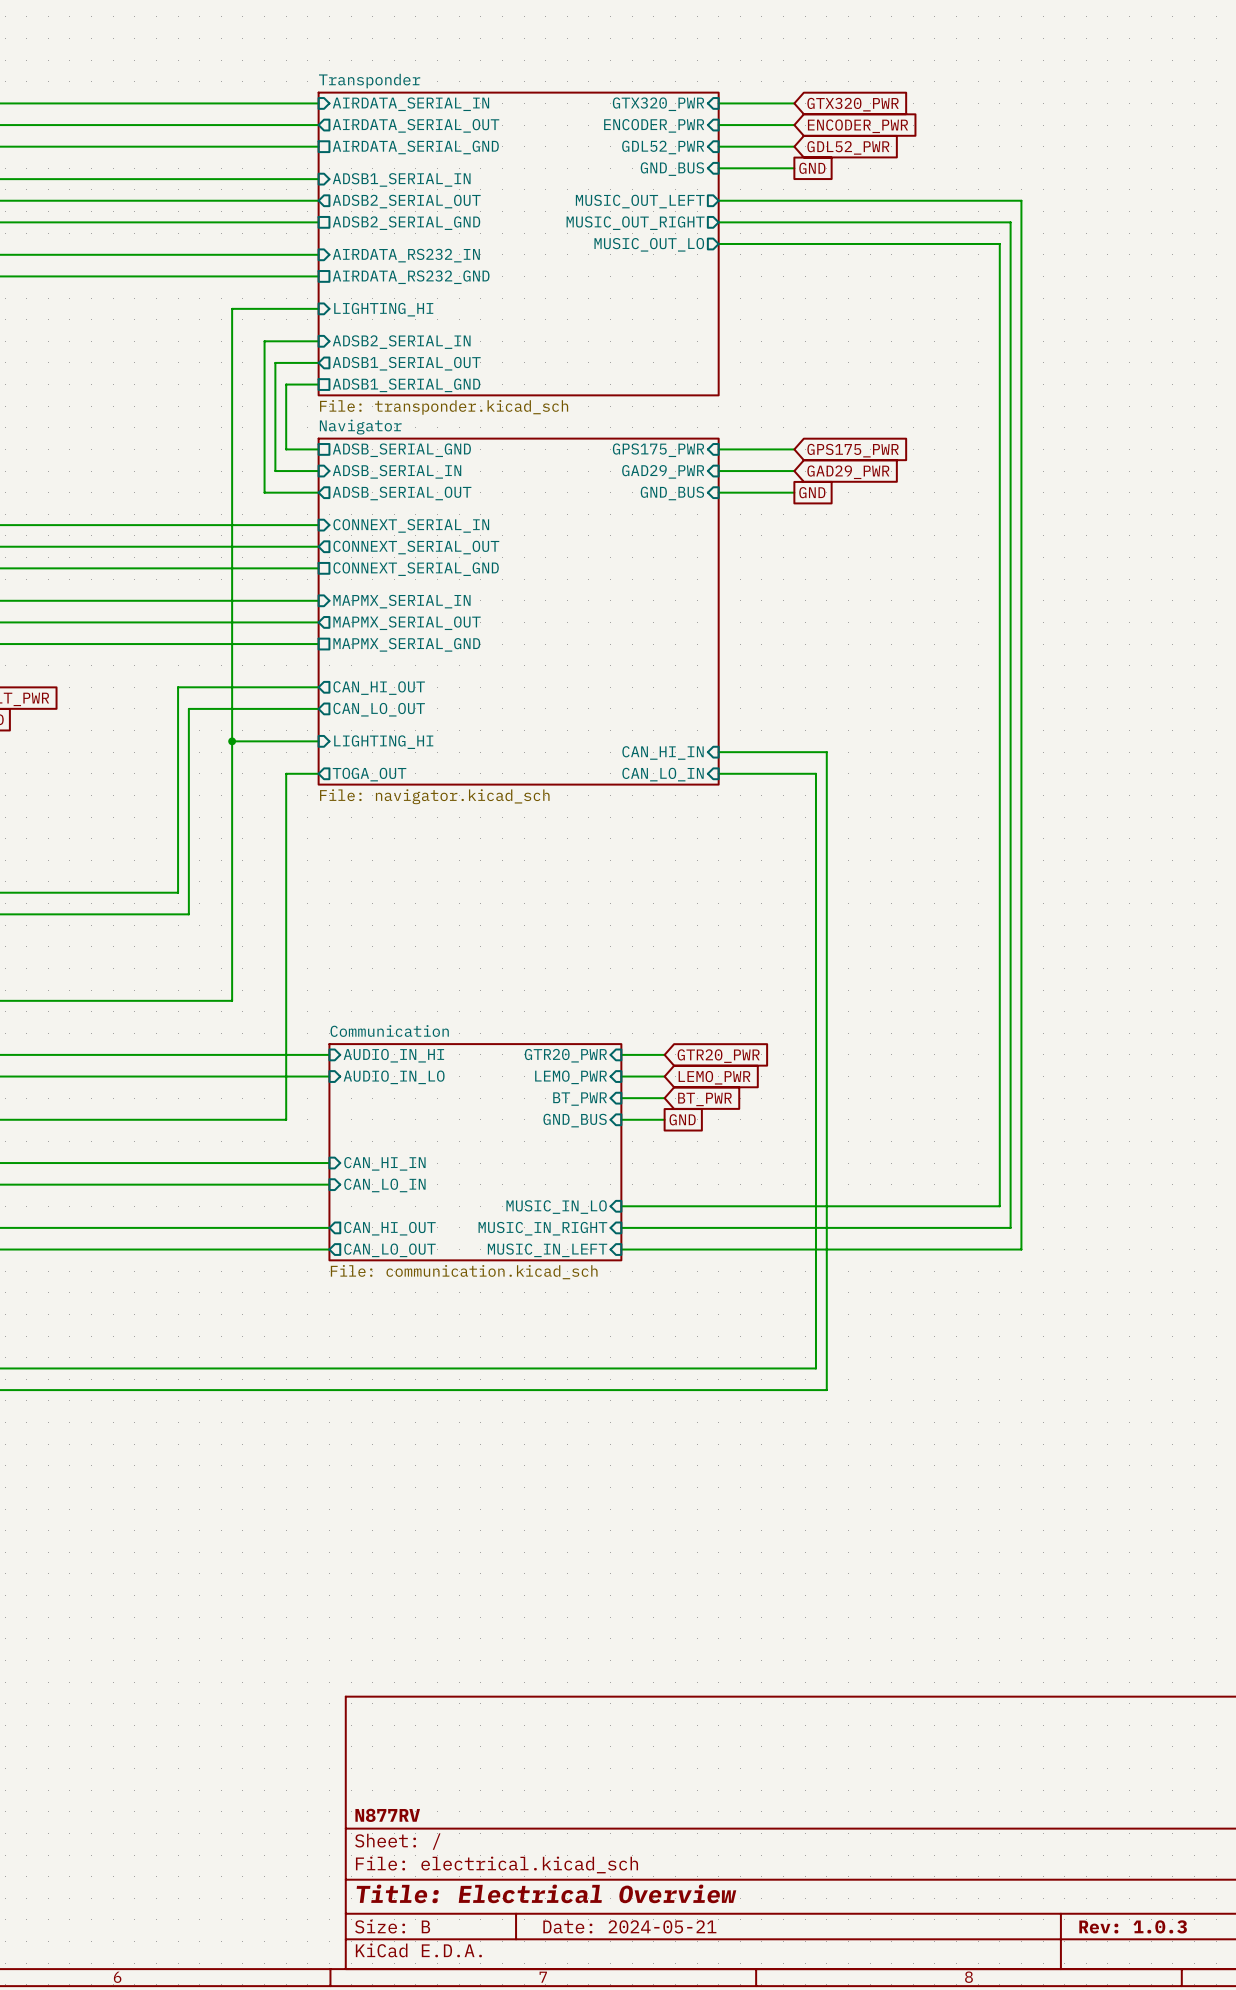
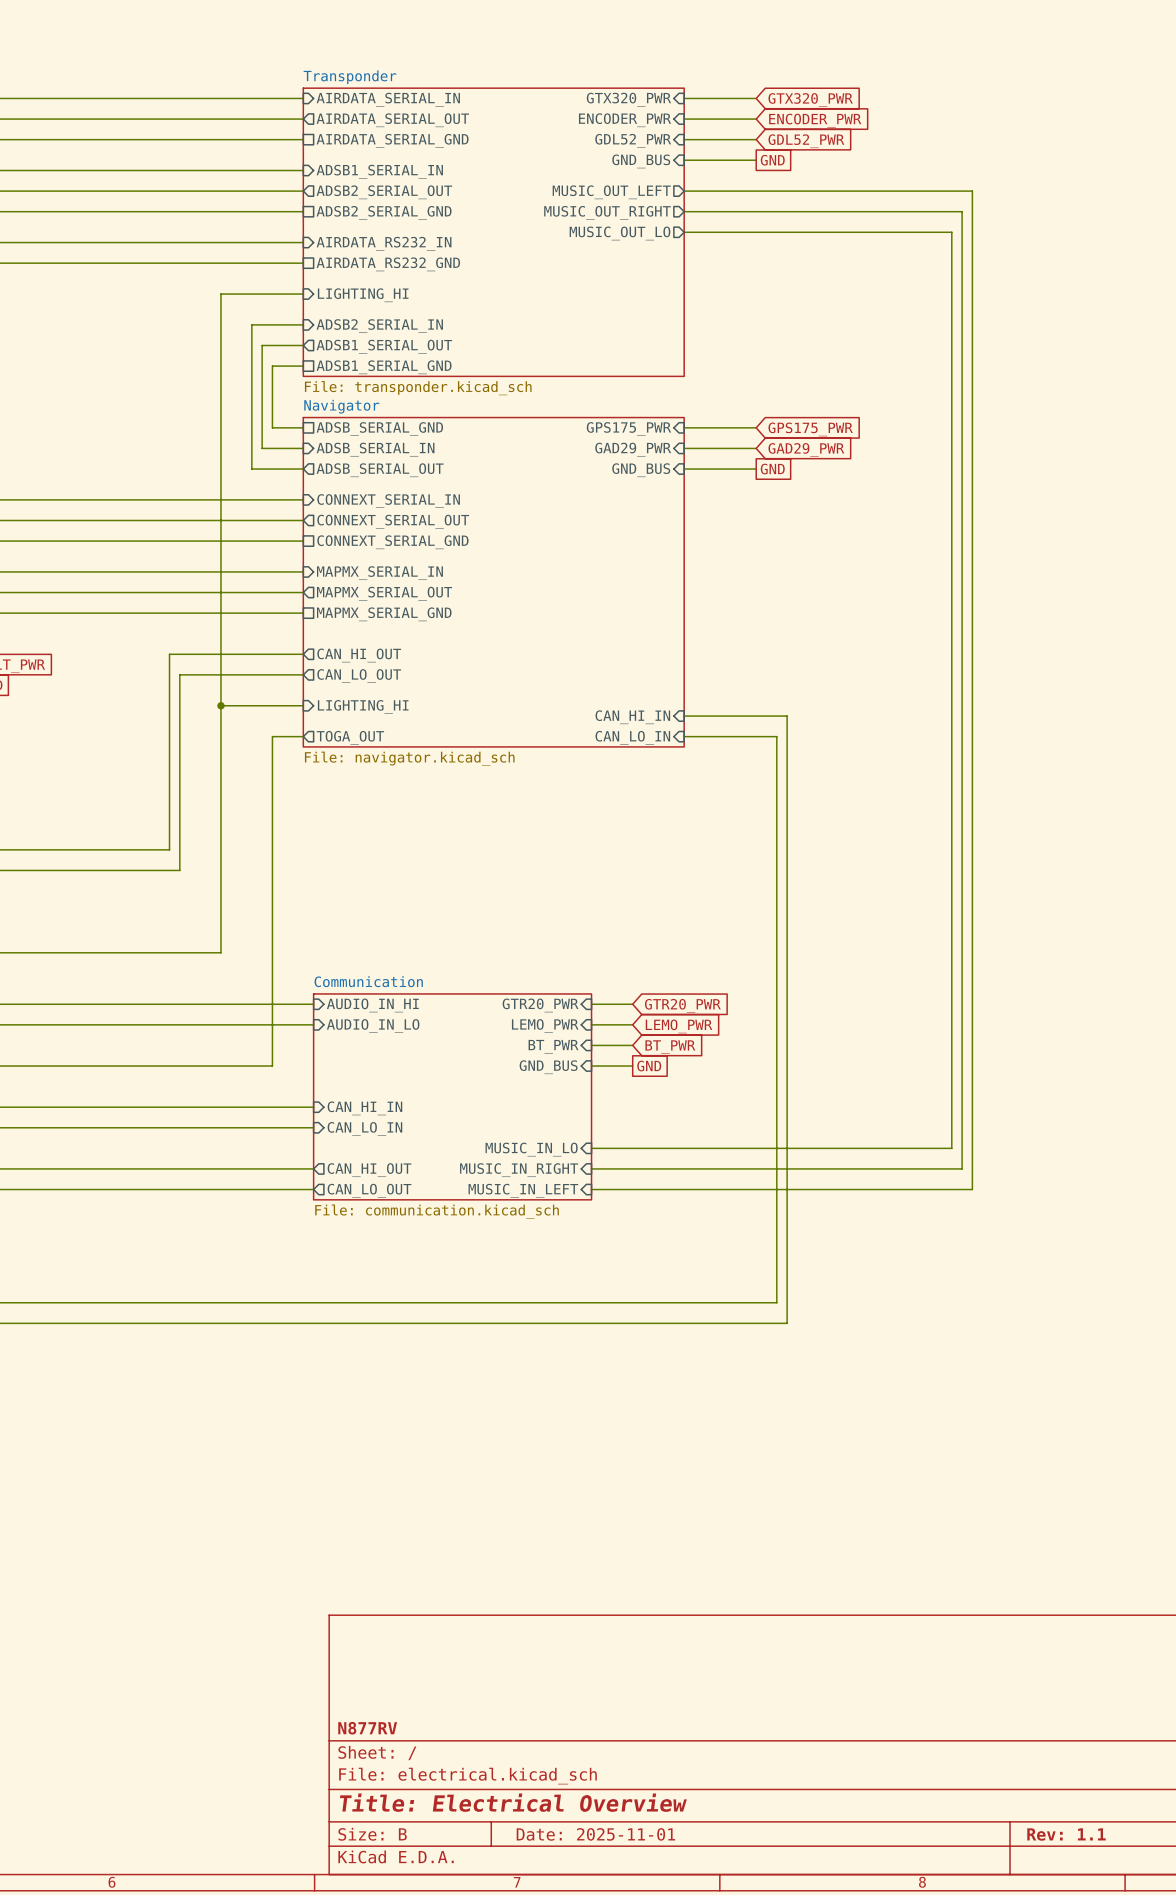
title block: Date: 2024-05-21 (629, 1926) -> Date: 2025-11-01 (595, 1834)
title block: Rev: 1.0.3 (1133, 1926) -> Rev: 1.1 (1066, 1834)

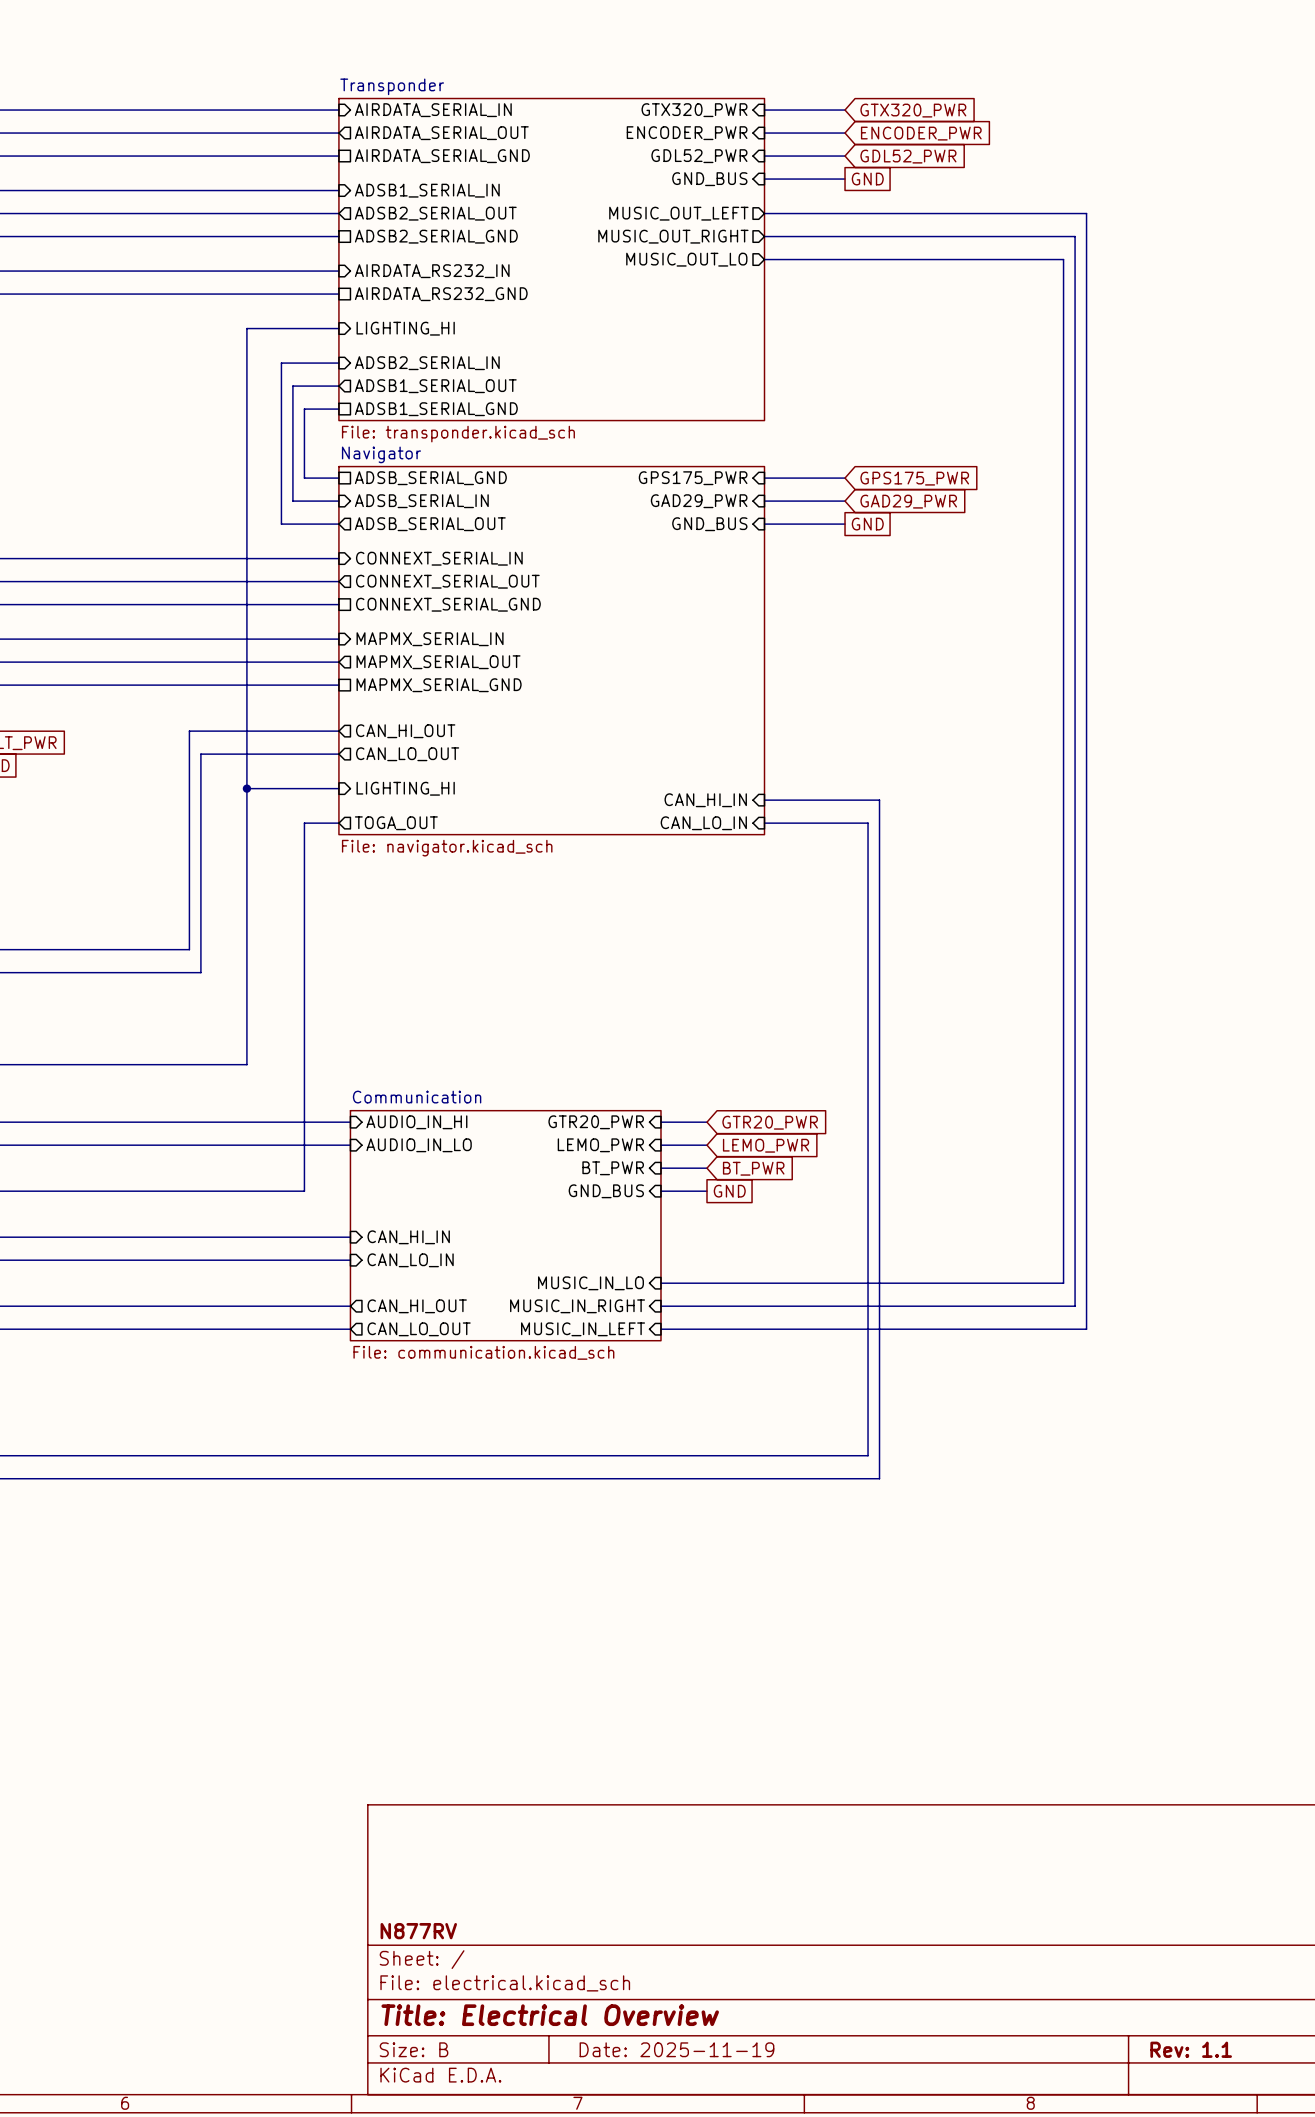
title block: Date: 2025-11-01 (595, 1834) -> Date: 2025-11-19 (676, 2049)

